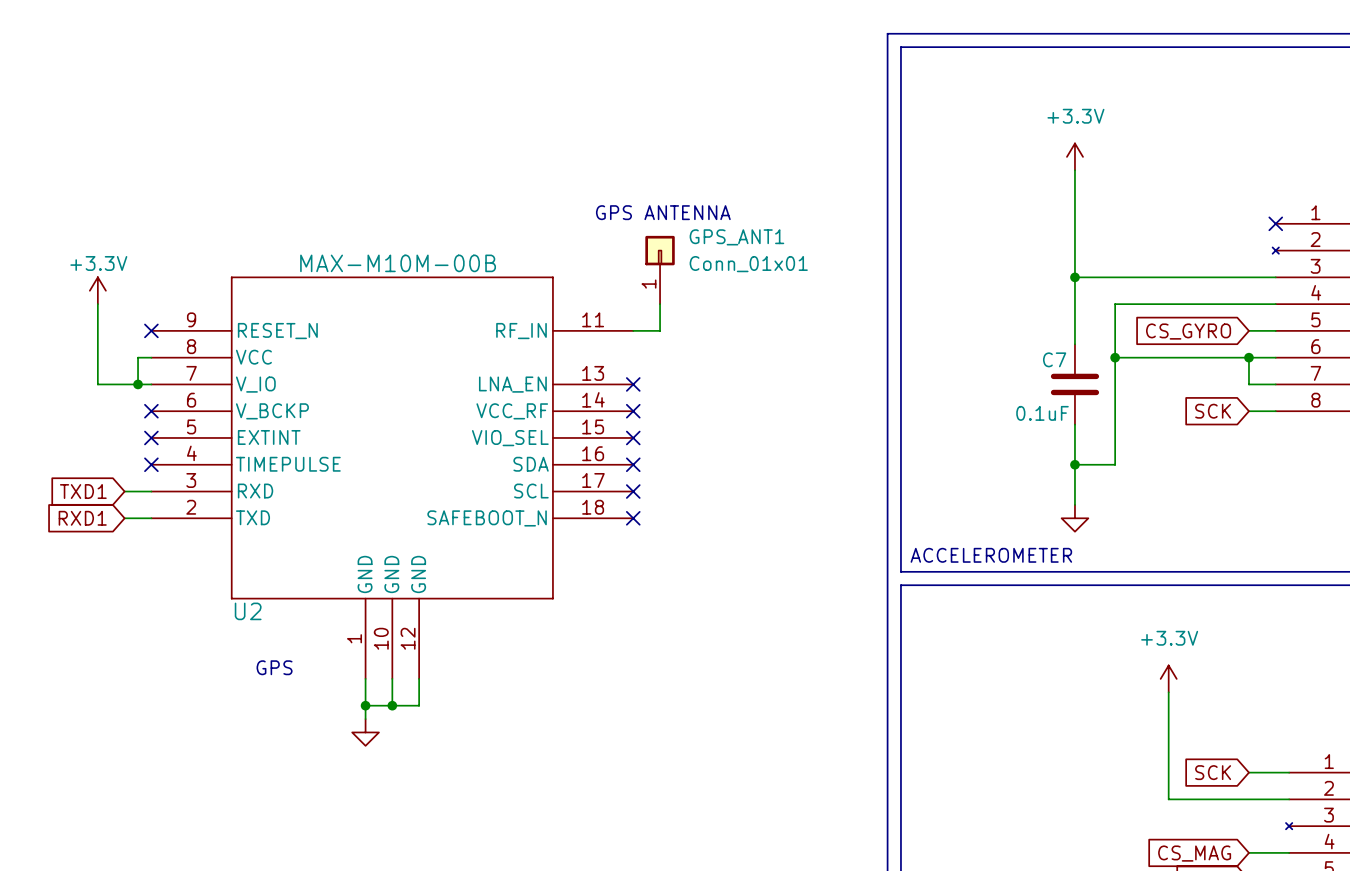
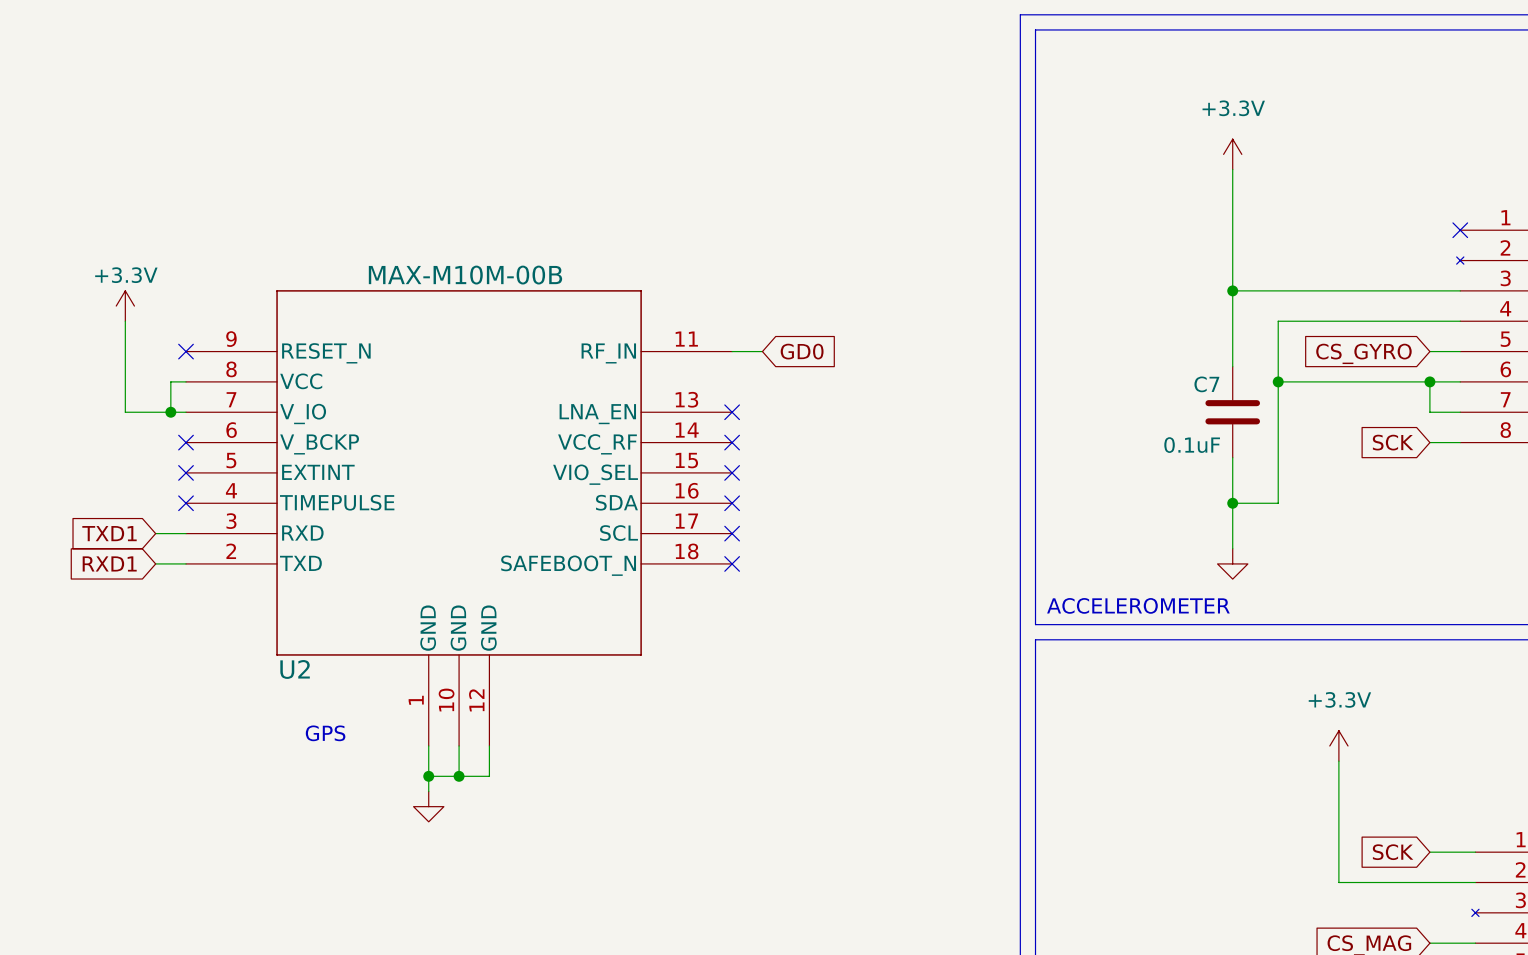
text: GPS ANTENNA (663, 212) -> none
GPS_ANT1: Conn_01x01 (660, 270) -> none
wire: (660, 304) (660, 330) -> none
global label: none -> GD0 (802, 351)

